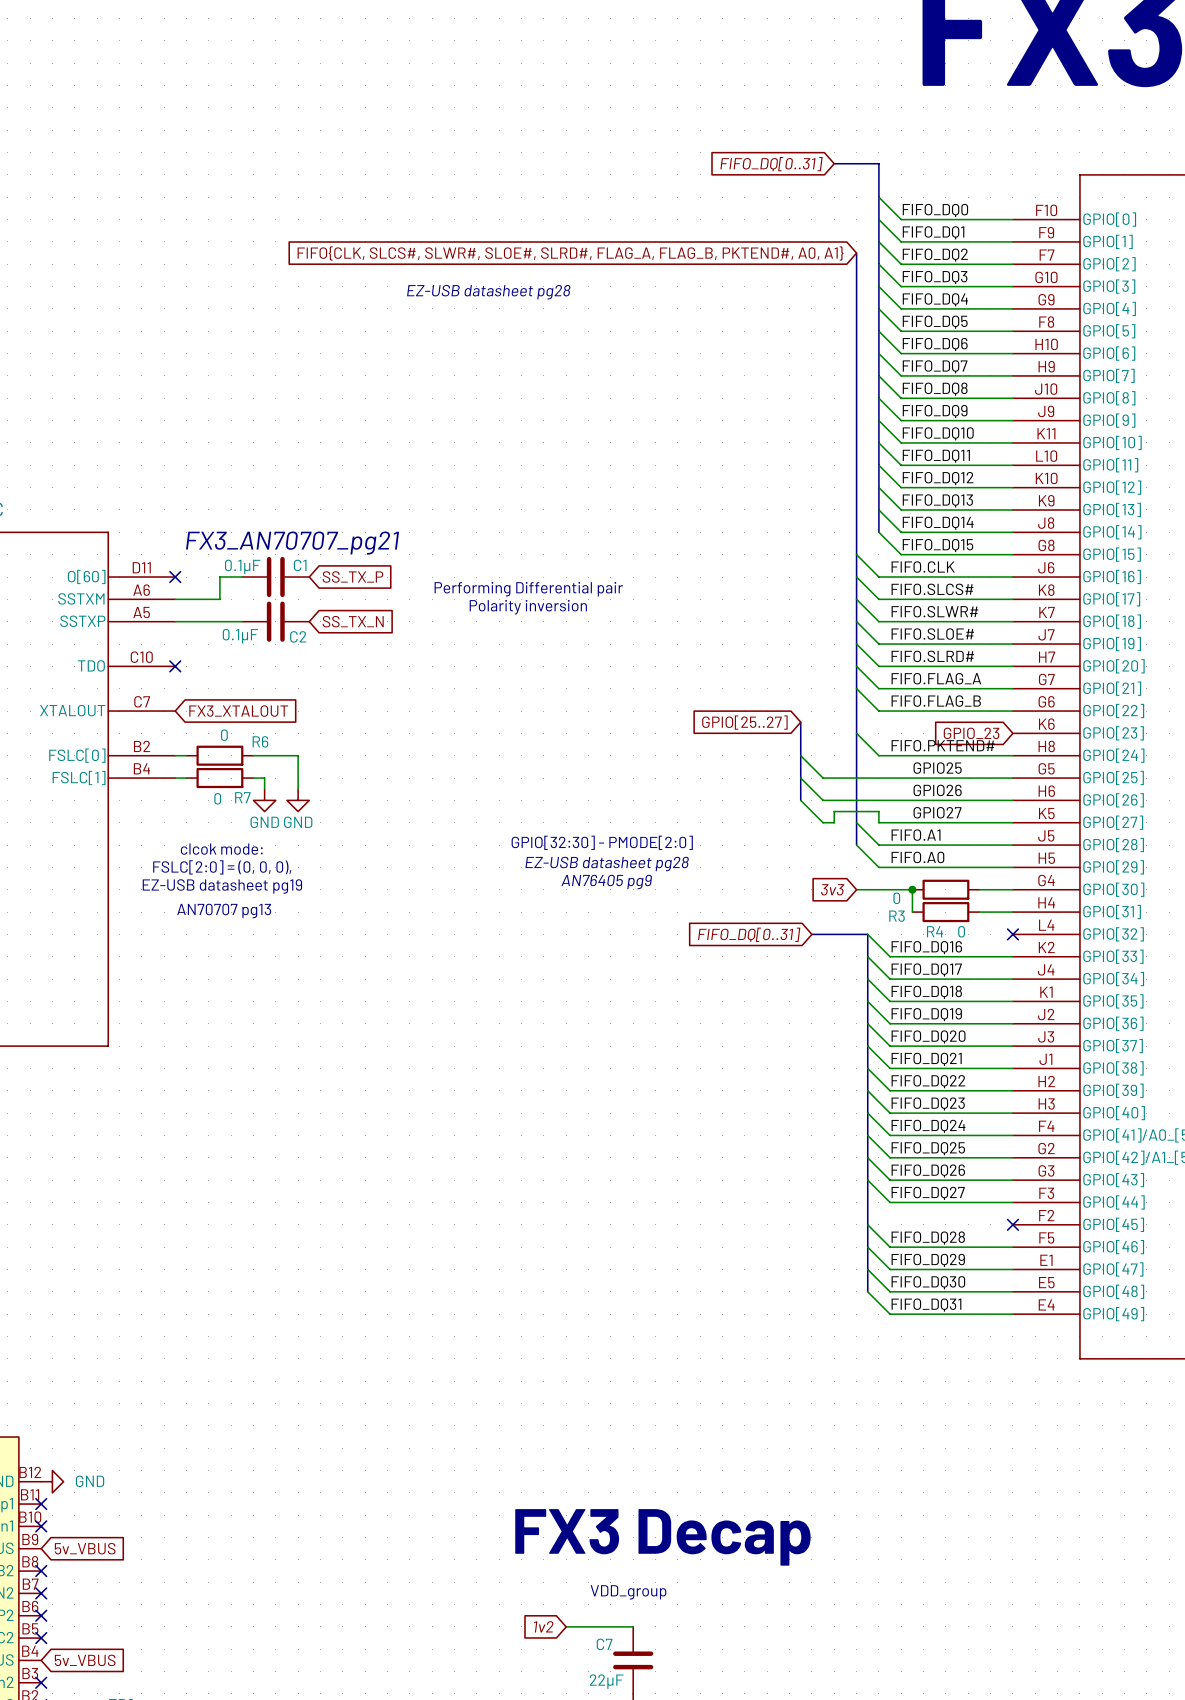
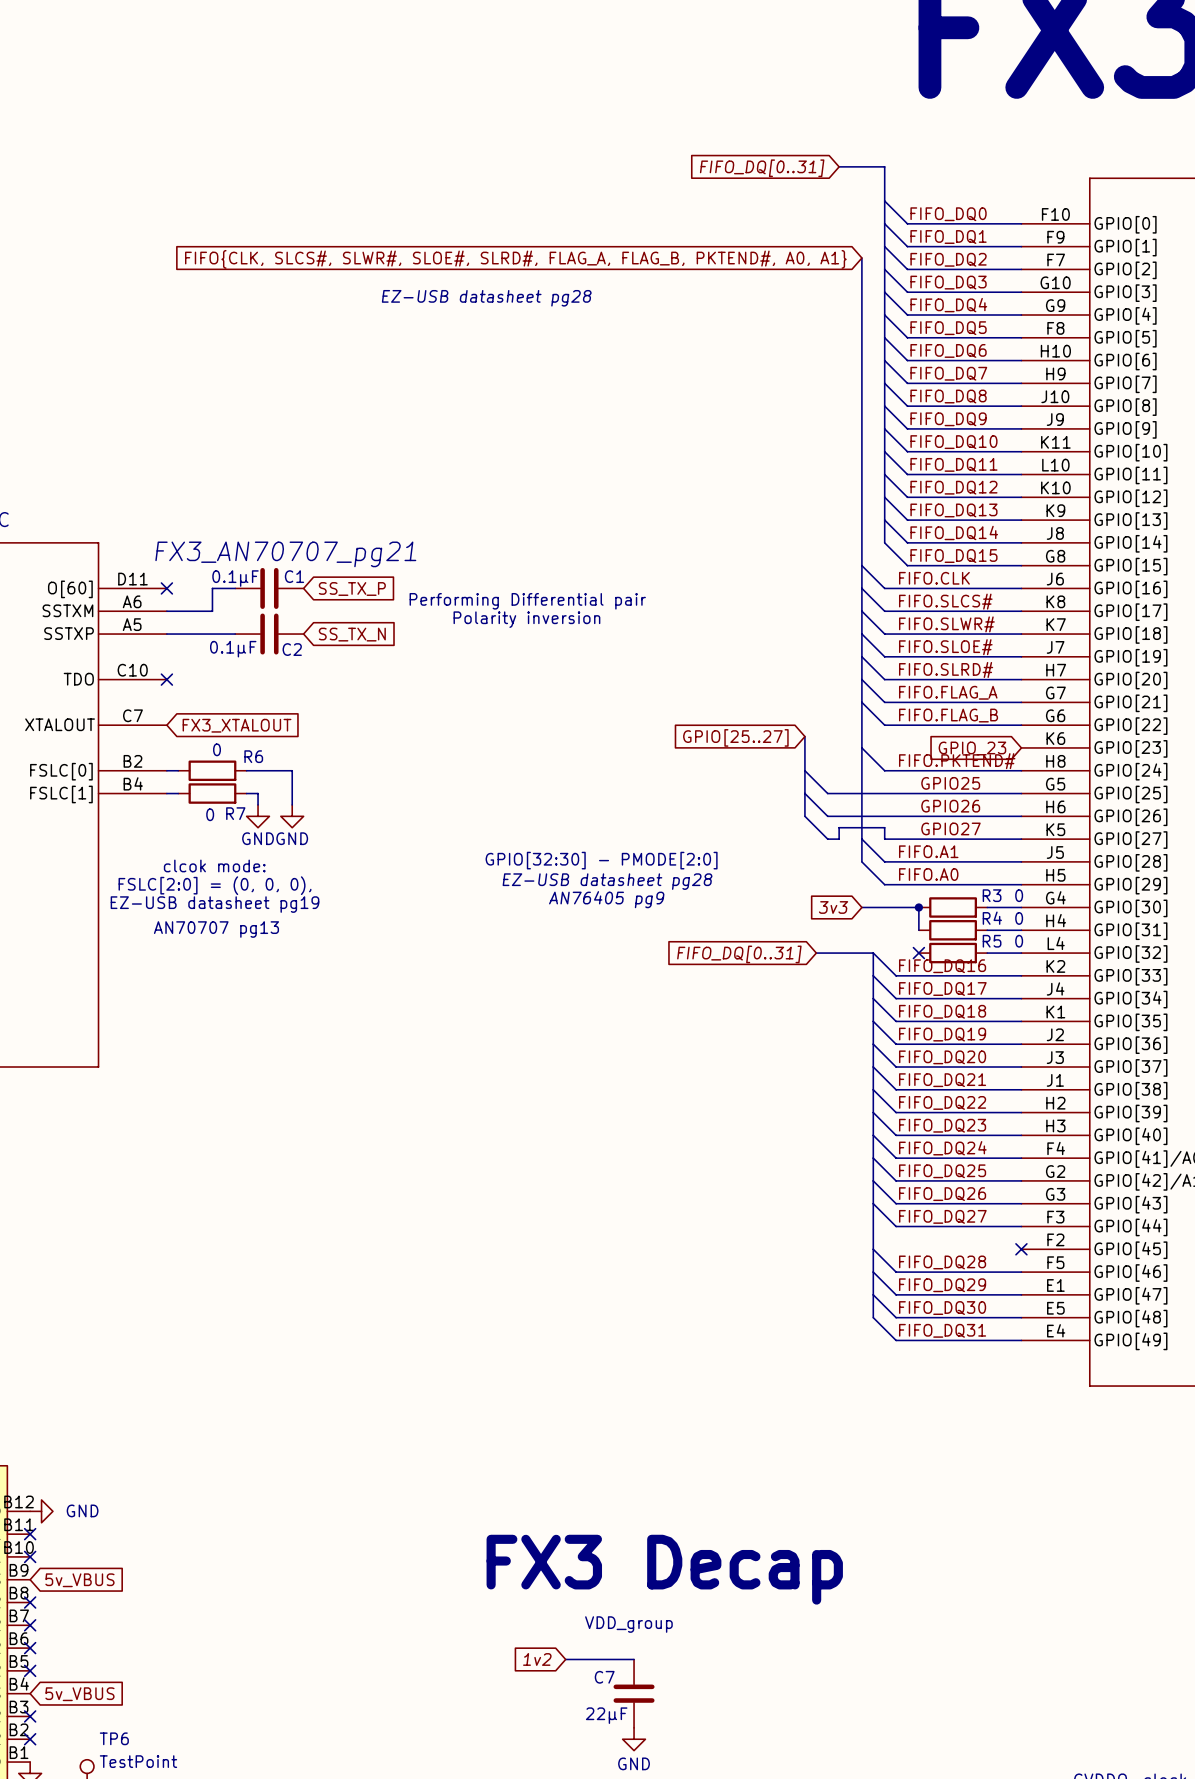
R3 value position: 0 (896, 898) -> 0 (1019, 895)
R3 name position: R3 (897, 916) -> R3 (992, 895)
R4 name position: R4 (935, 931) -> R4 (992, 918)
R4 value position: 0 (961, 931) -> 0 (1019, 918)
no-connect mark: none -> (918, 953)
R5: none -> 0 (953, 953)
wire: none -> (987, 953) (1021, 953)
no-connect mark: (1012, 934) -> none

